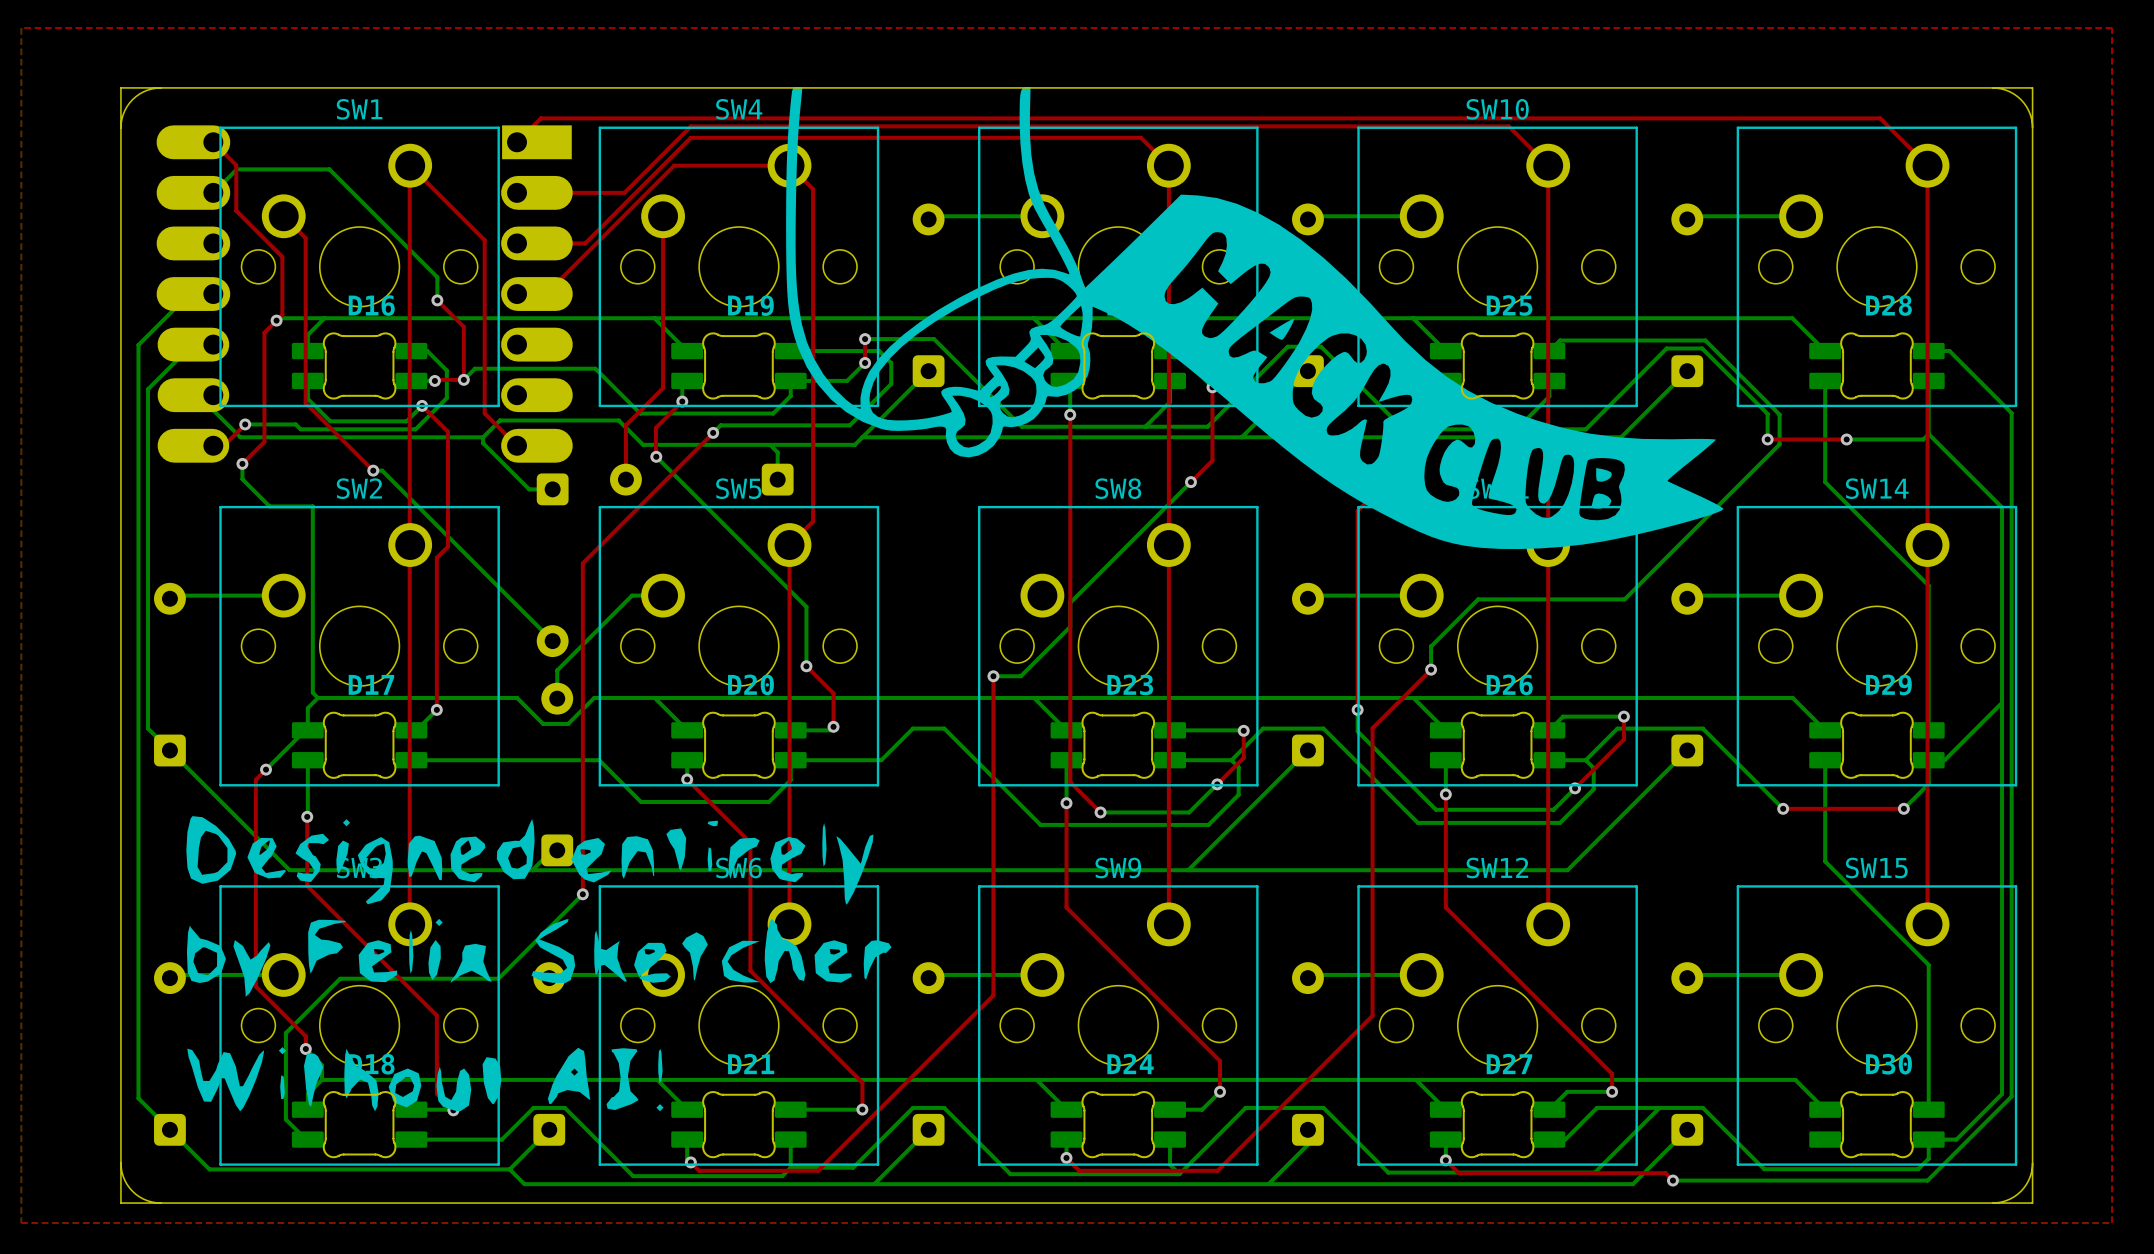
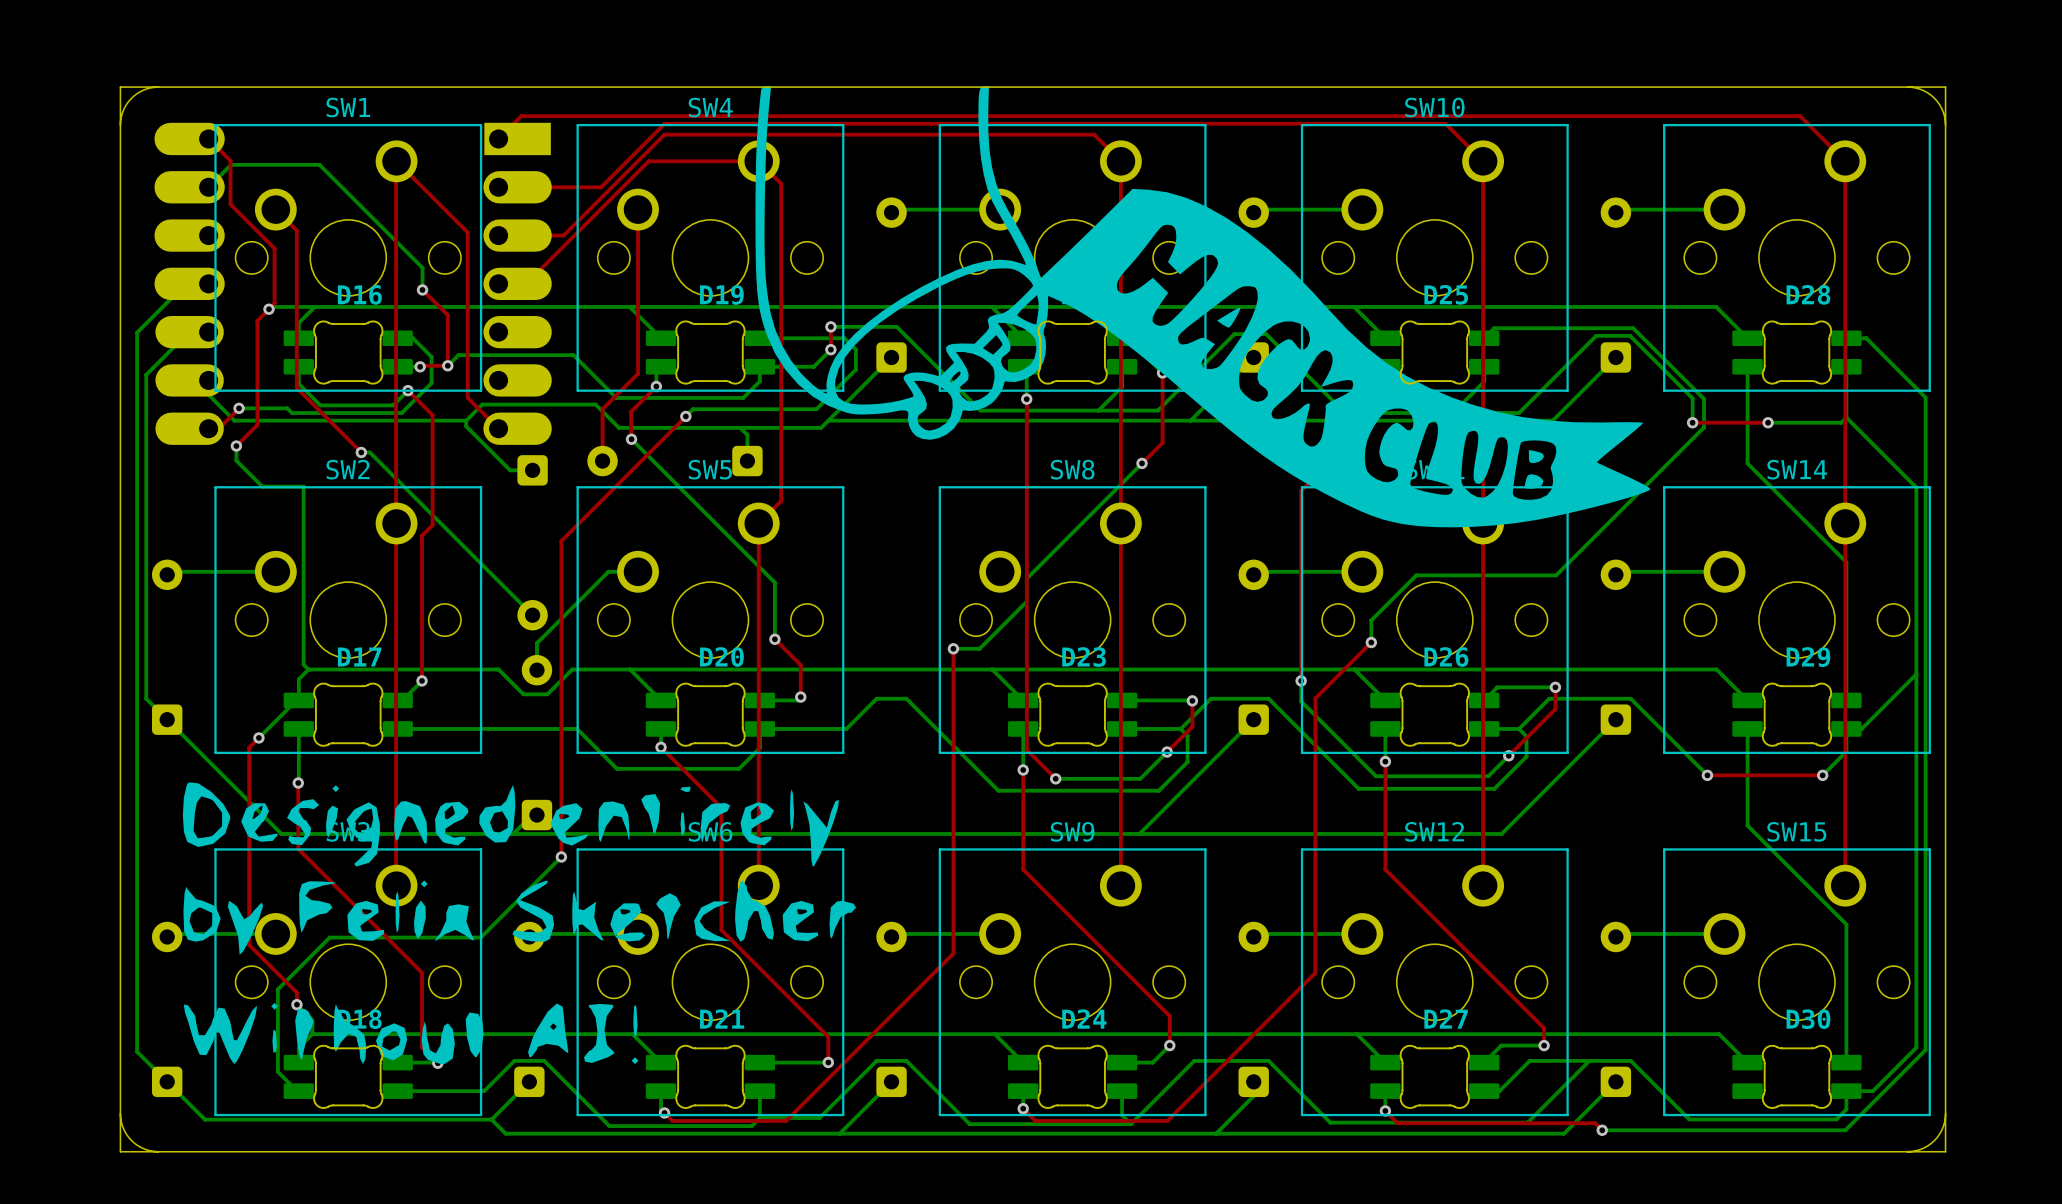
top zone outline: (21, 28) (2112, 28) (2112, 1222) (21, 1222) (21, 28) -> none

